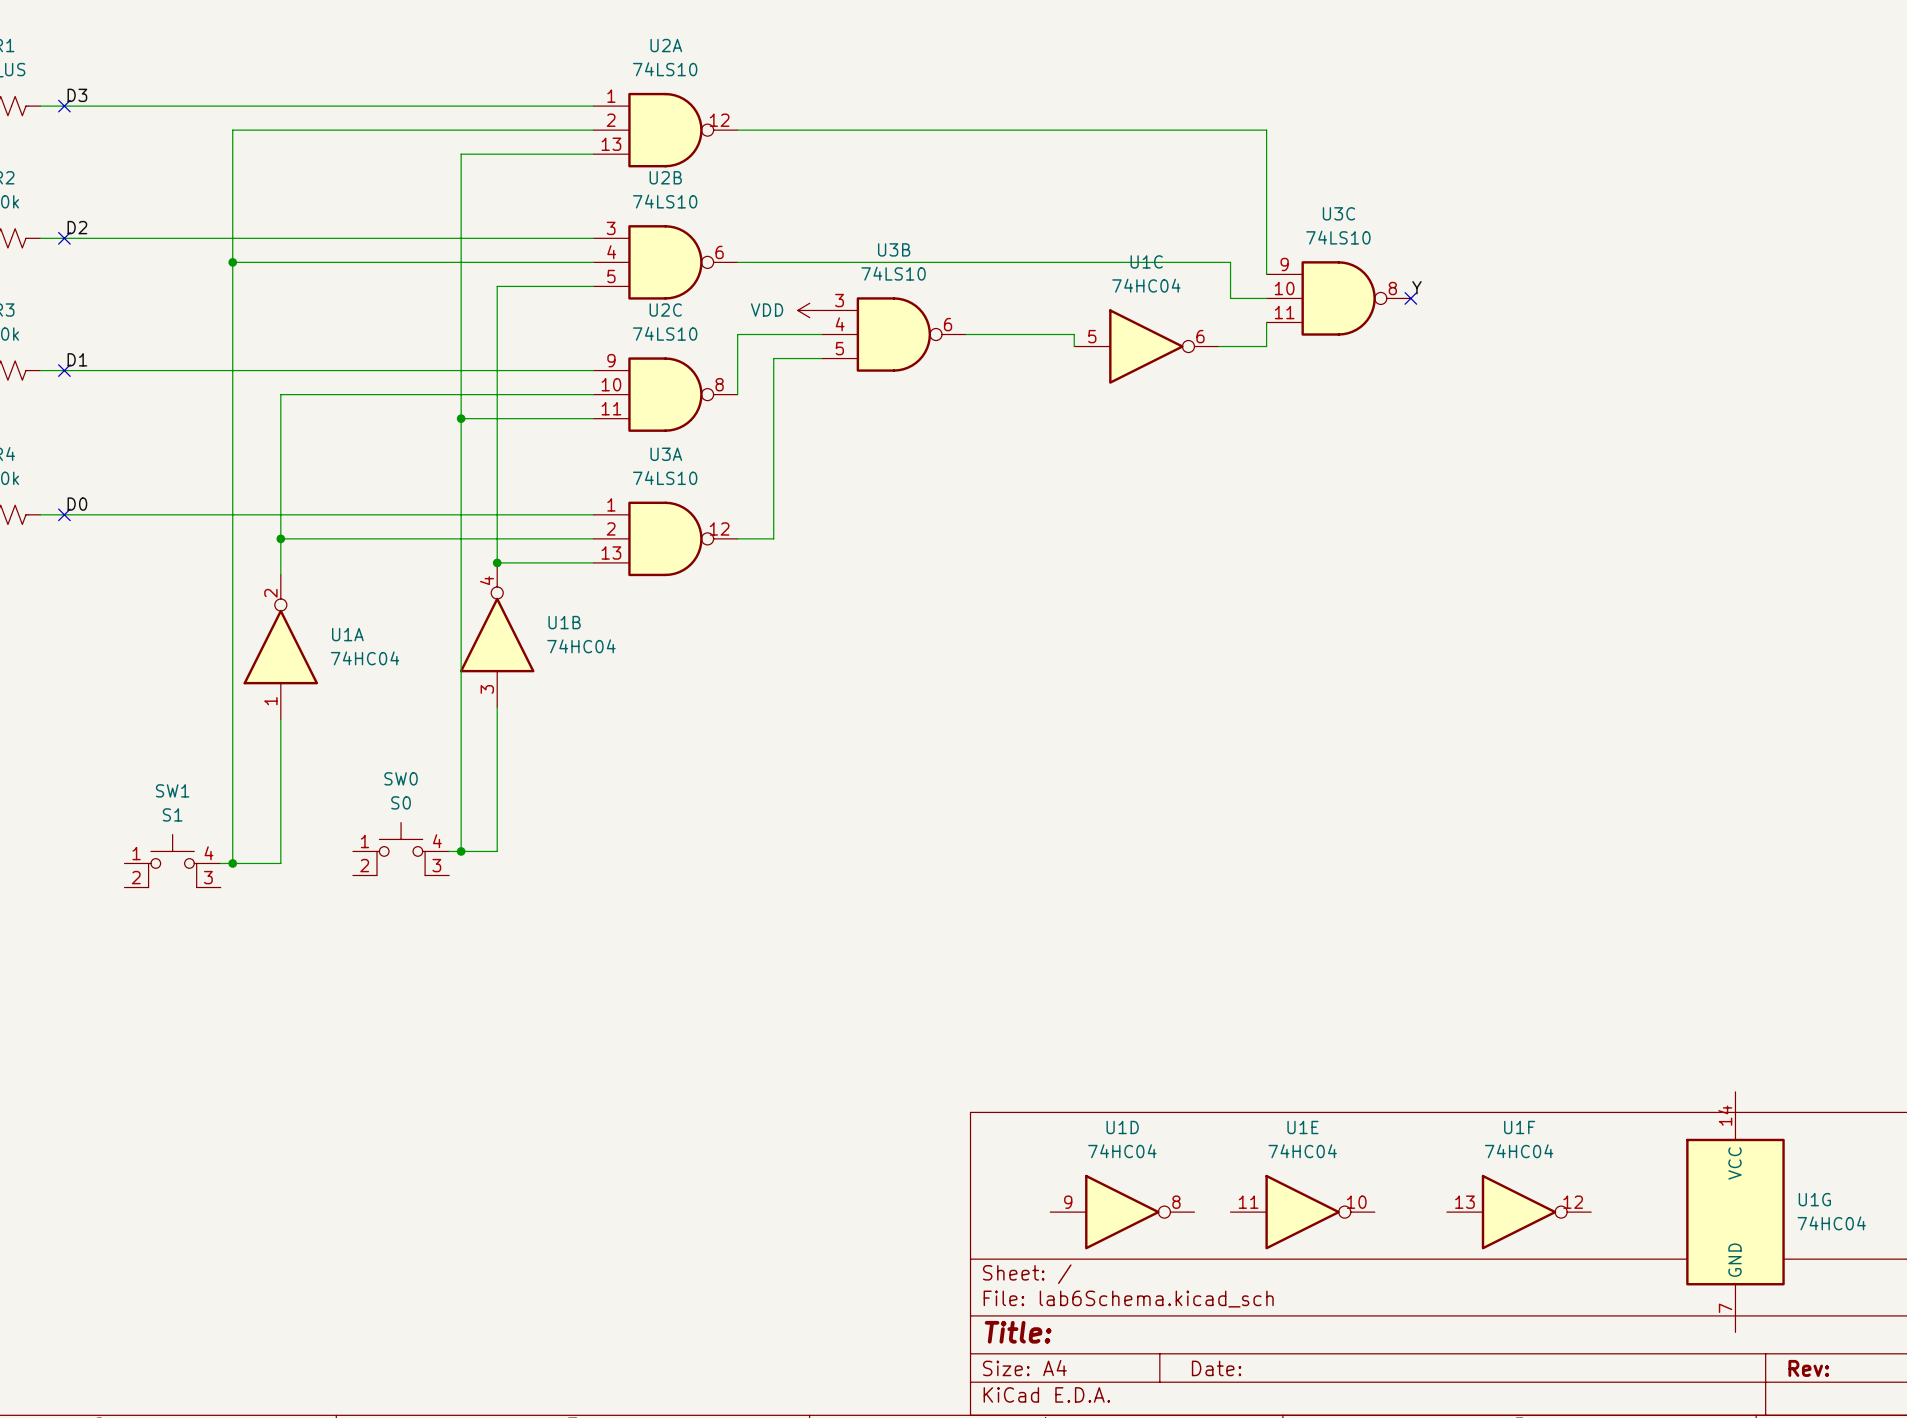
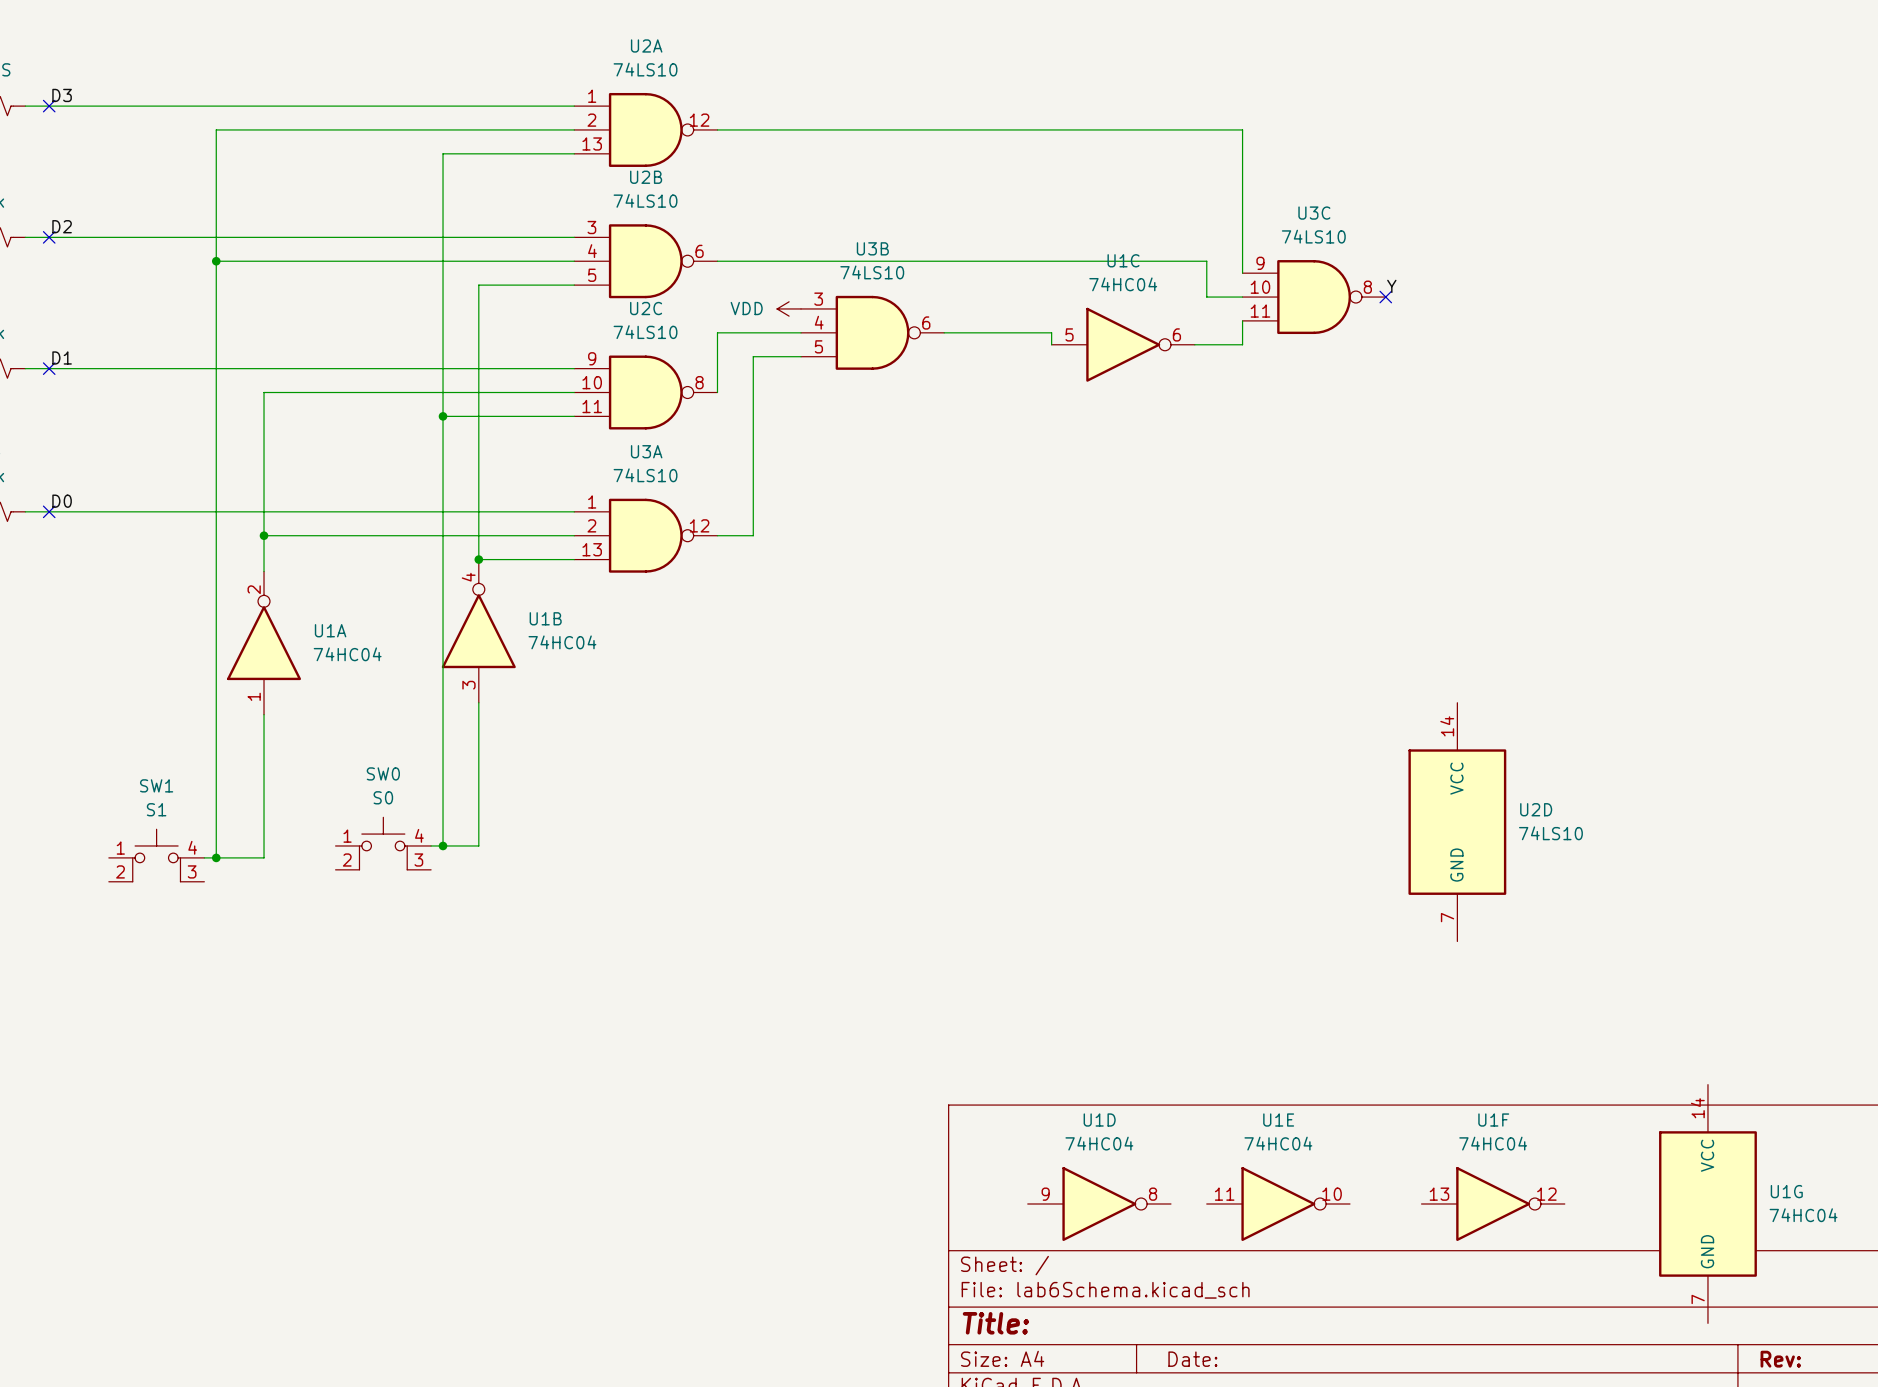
U2D: none -> 74LS10 (1457, 822)

